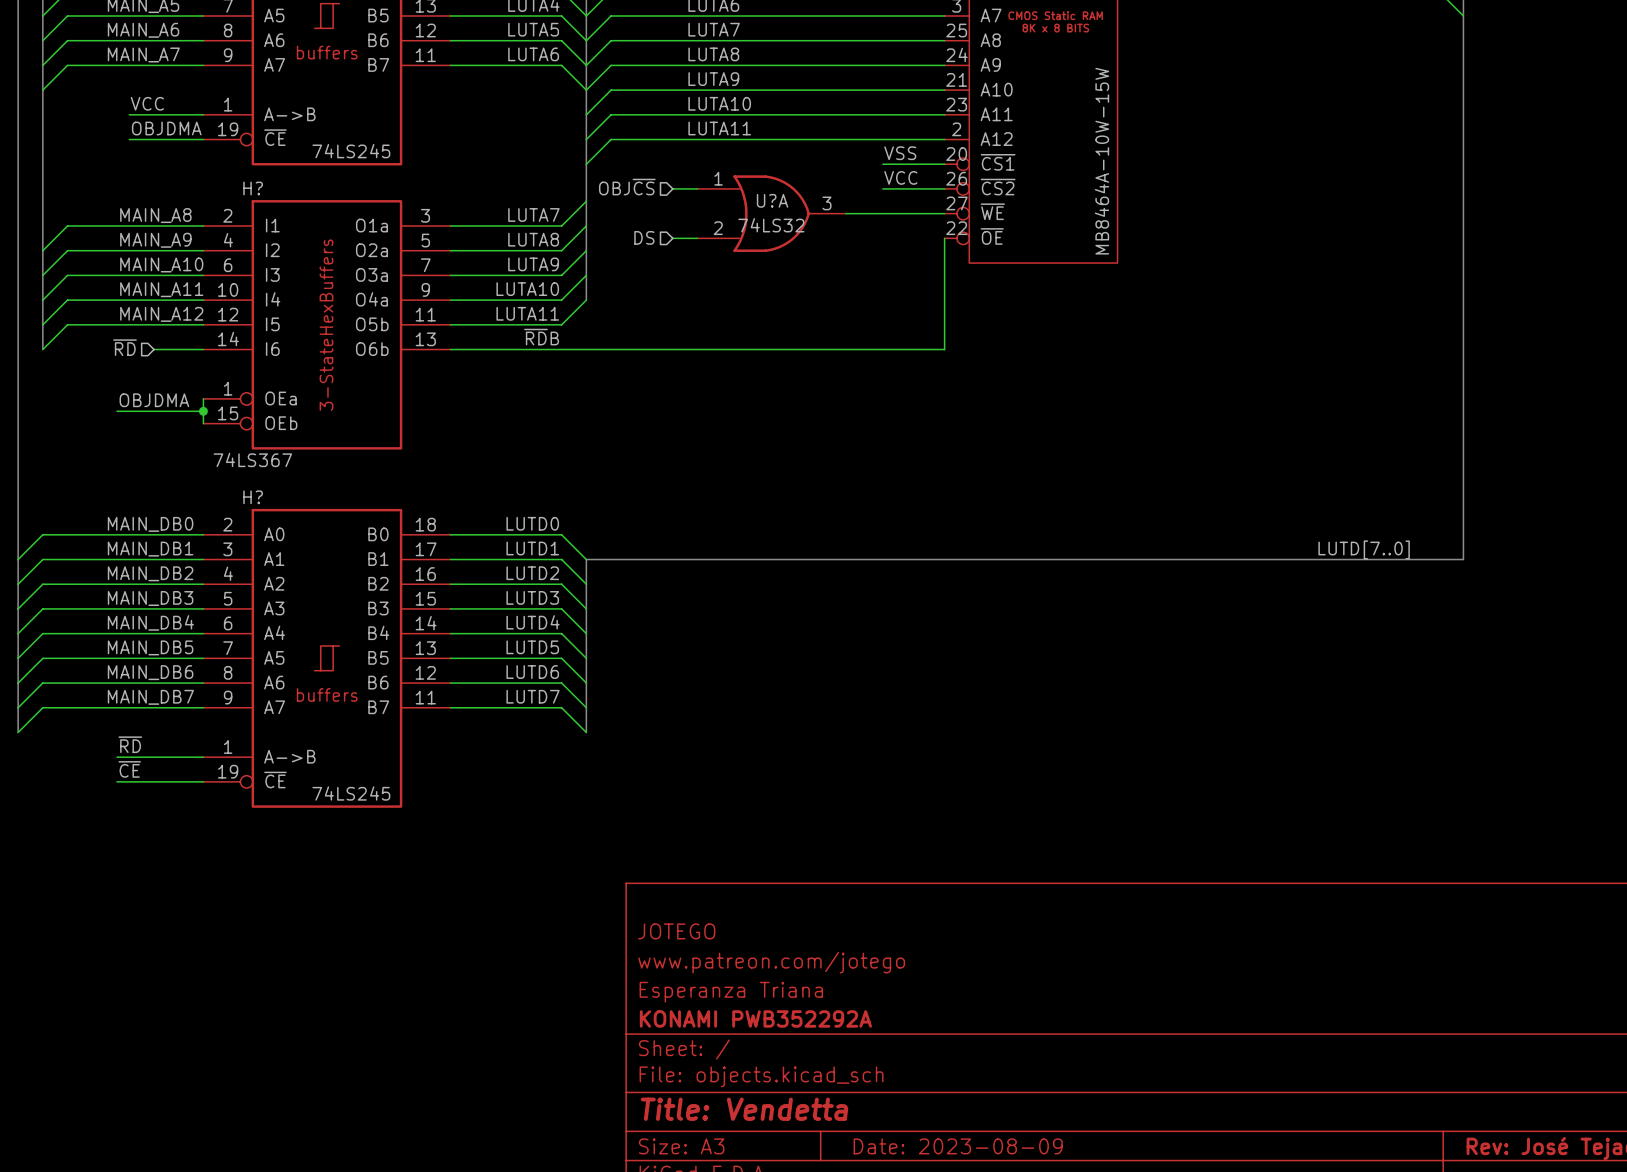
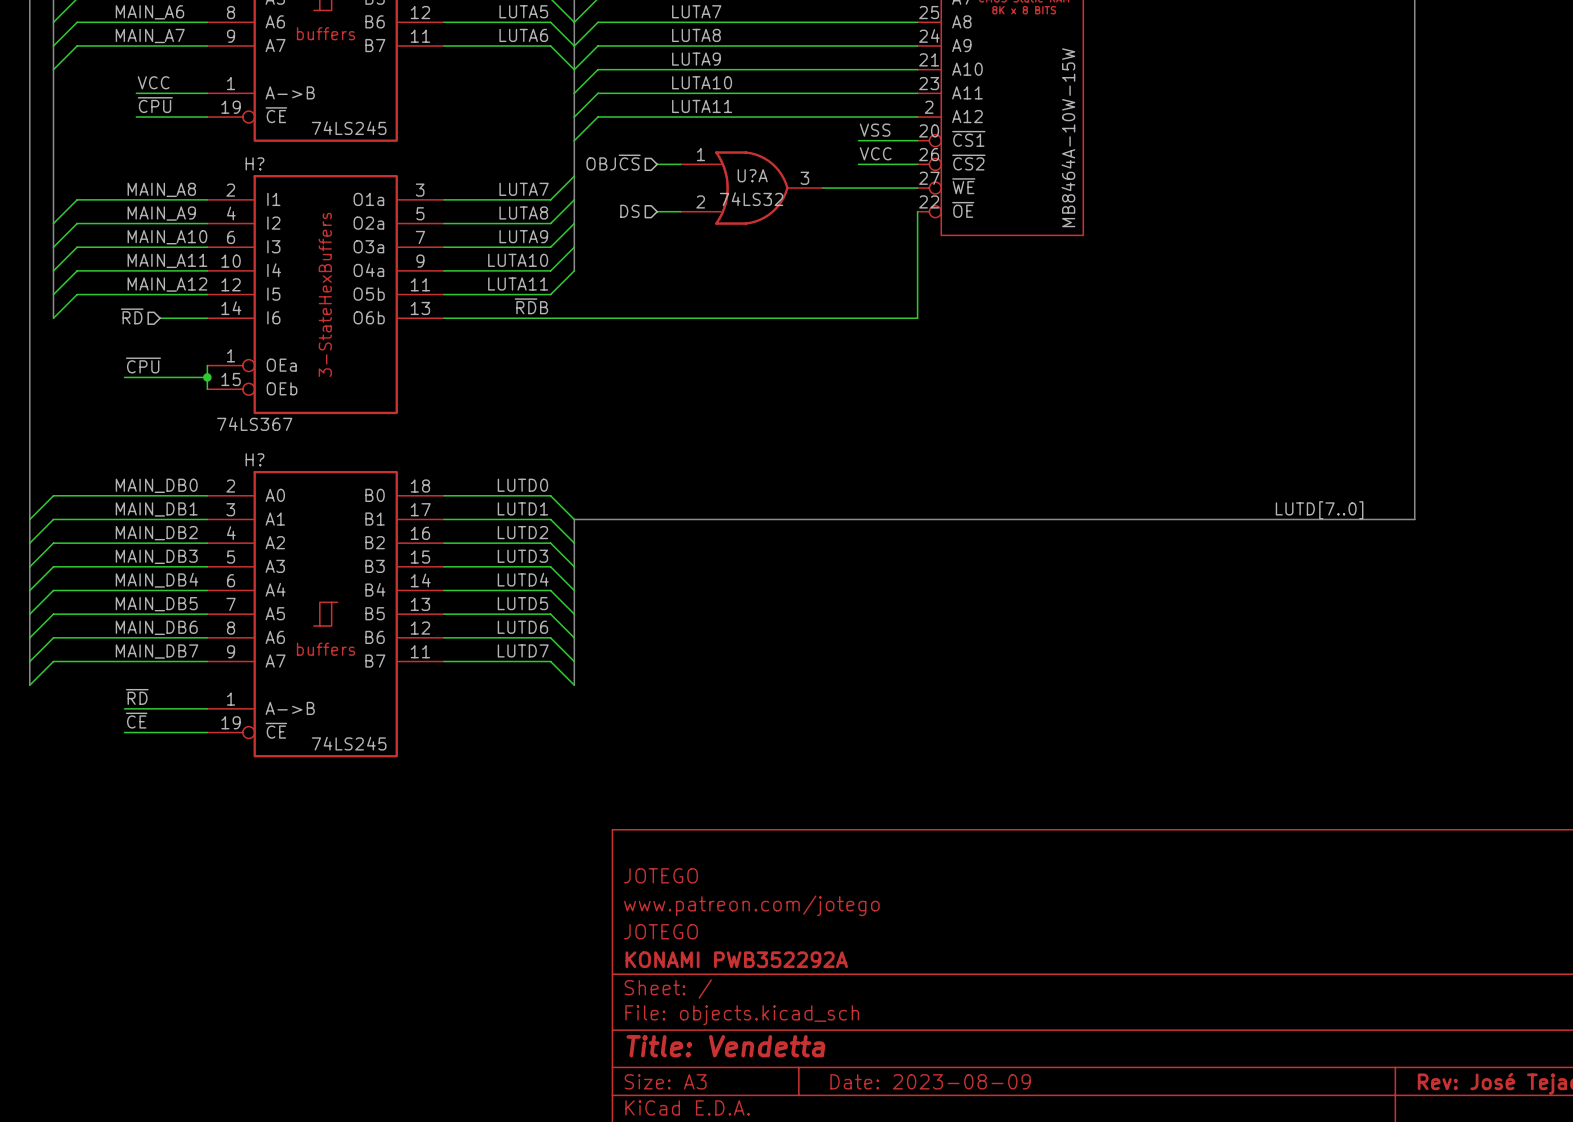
label: OBJDMA (166, 128) -> ~{CPU} (155, 105)
label: OBJDMA (154, 400) -> ~{CPU} (143, 365)
title block: Esperanza Triana (731, 992) -> JOTEGO (660, 931)

